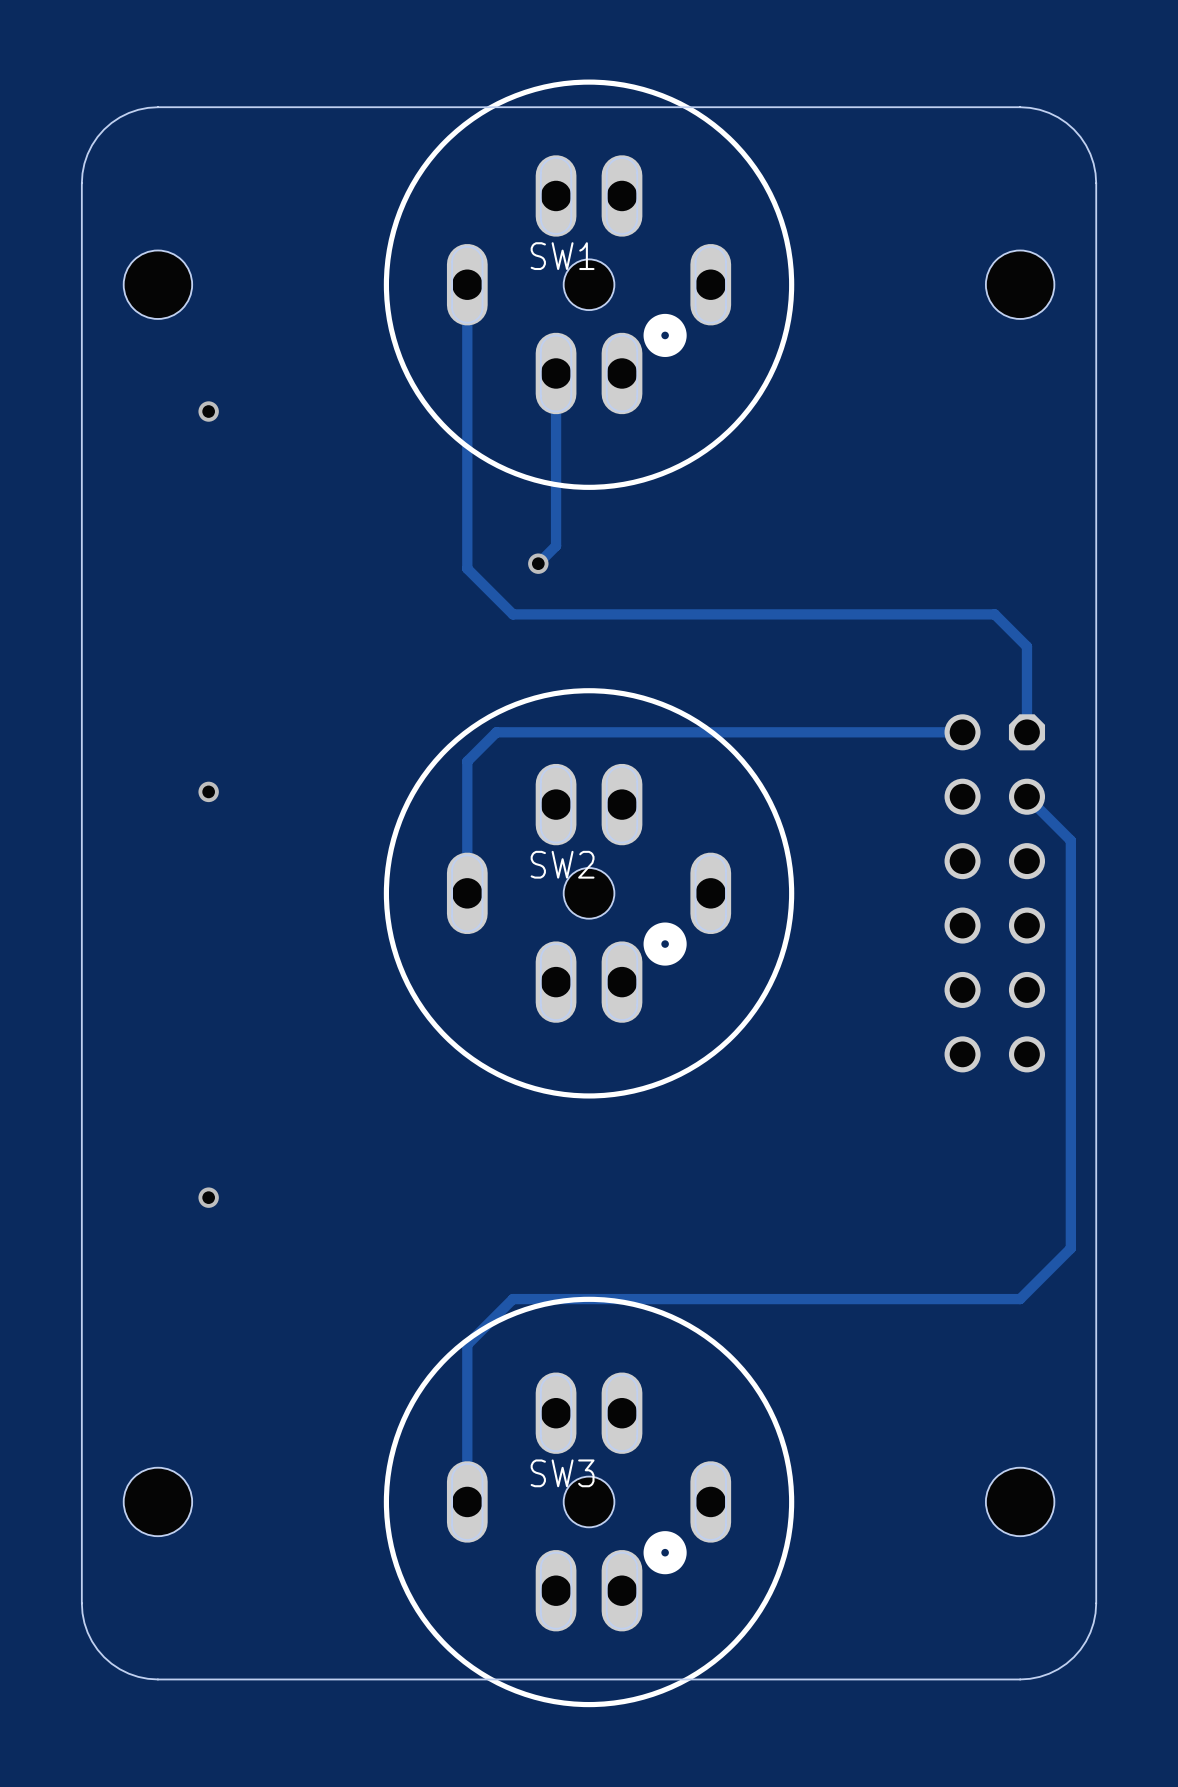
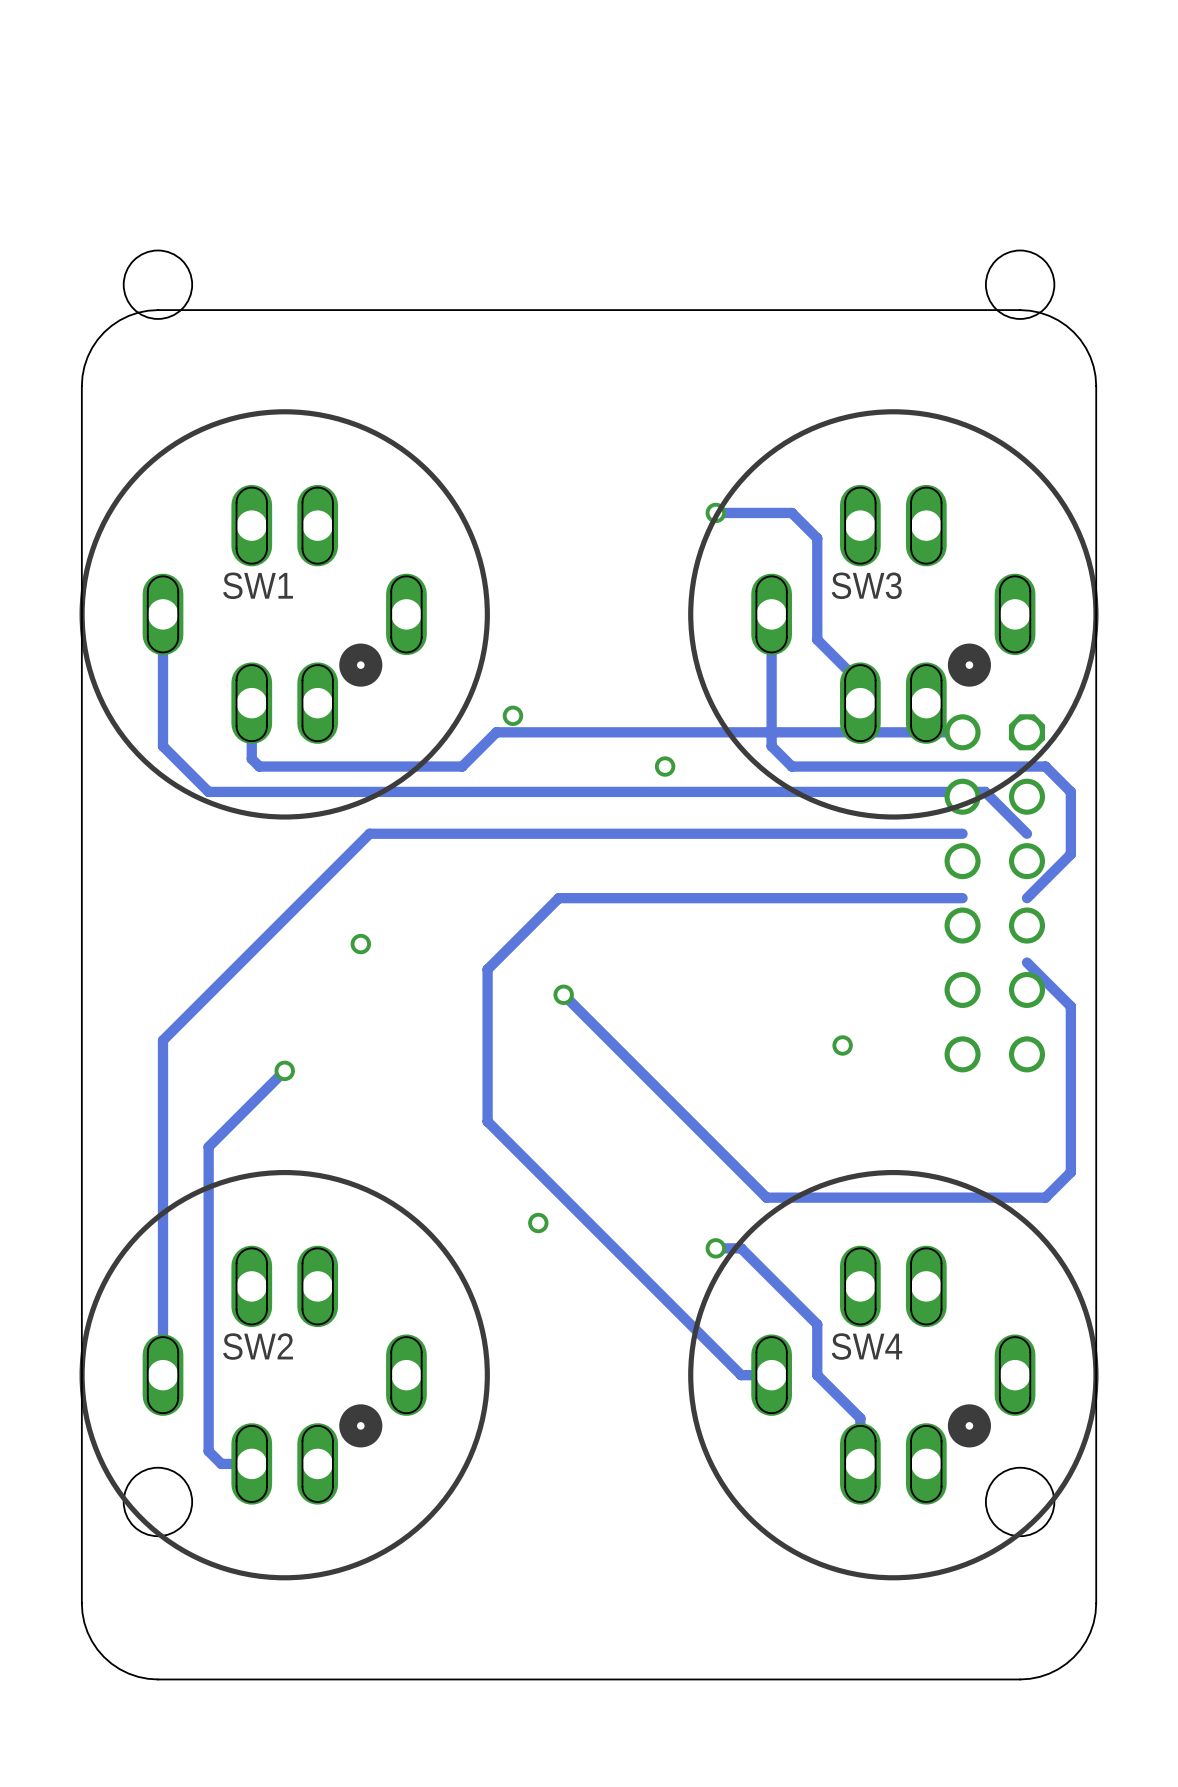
track: (467, 284) (467, 568) (512, 614) (994, 614) (1026, 646) (1026, 732) -> none
hole: (589, 284) -> none
SW1 position: (589, 284) -> (284, 614)
track: (556, 373) (556, 545) (538, 563) -> none
board edge: (1096, 386) (1096, 183) (1093, 163) (1080, 136) (1066, 122) (1039, 109) (1020, 107) (157, 107) (138, 109) (119, 117) (104, 129) (92, 145) (84, 163) (81, 183) (81, 386) -> (1096, 386) (1090, 357) (1073, 332) (1049, 315) (1020, 310) (148, 310) (119, 320) (97, 339) (84, 366) (81, 386)
via: (208, 411) -> none
track: none -> (715, 512) (791, 512) (817, 538) (817, 639) (860, 682) (860, 703)
via: none -> (715, 512)
via: (538, 563) -> none
track: none -> (163, 614) (163, 746) (208, 791) (985, 791) (1026, 833)
via: none -> (512, 715)
track: (467, 761) (467, 893) -> (467, 761) (462, 766) (259, 766) (251, 758) (251, 703)
via: none -> (665, 766)
via: (208, 791) -> none
track: (1026, 796) (1070, 840) -> (771, 614) (771, 746) (791, 766) (1045, 766) (1070, 791) (1070, 840)
track: none -> (962, 833) (369, 833) (163, 1040) (163, 1375)
track: (1070, 854) (1070, 1006) -> (1070, 854) (1026, 898)
hole: (589, 893) -> none
SW2 position: (589, 893) -> (284, 1375)
track: none -> (962, 898) (558, 898) (487, 969) (487, 1121) (741, 1375) (771, 1375)
via: none -> (360, 944)
track: none -> (1026, 962) (1070, 1006)
via: none -> (563, 994)
via: none -> (842, 1045)
track: none -> (284, 1070) (208, 1146) (208, 1451) (221, 1463) (251, 1463)
via: none -> (284, 1070)
track: (1070, 1172) (1070, 1248) (1020, 1299) (512, 1299) (467, 1344) (467, 1501) -> (1070, 1172) (1045, 1197) (766, 1197) (563, 994)
via: (208, 1197) -> none
via: none -> (538, 1223)
track: none -> (715, 1248) (741, 1248) (817, 1324) (817, 1375) (860, 1418) (860, 1463)
via: none -> (715, 1248)
SW4: none -> (893, 1375)
hole: (589, 1501) -> none
SW3 position: (589, 1501) -> (893, 614)

